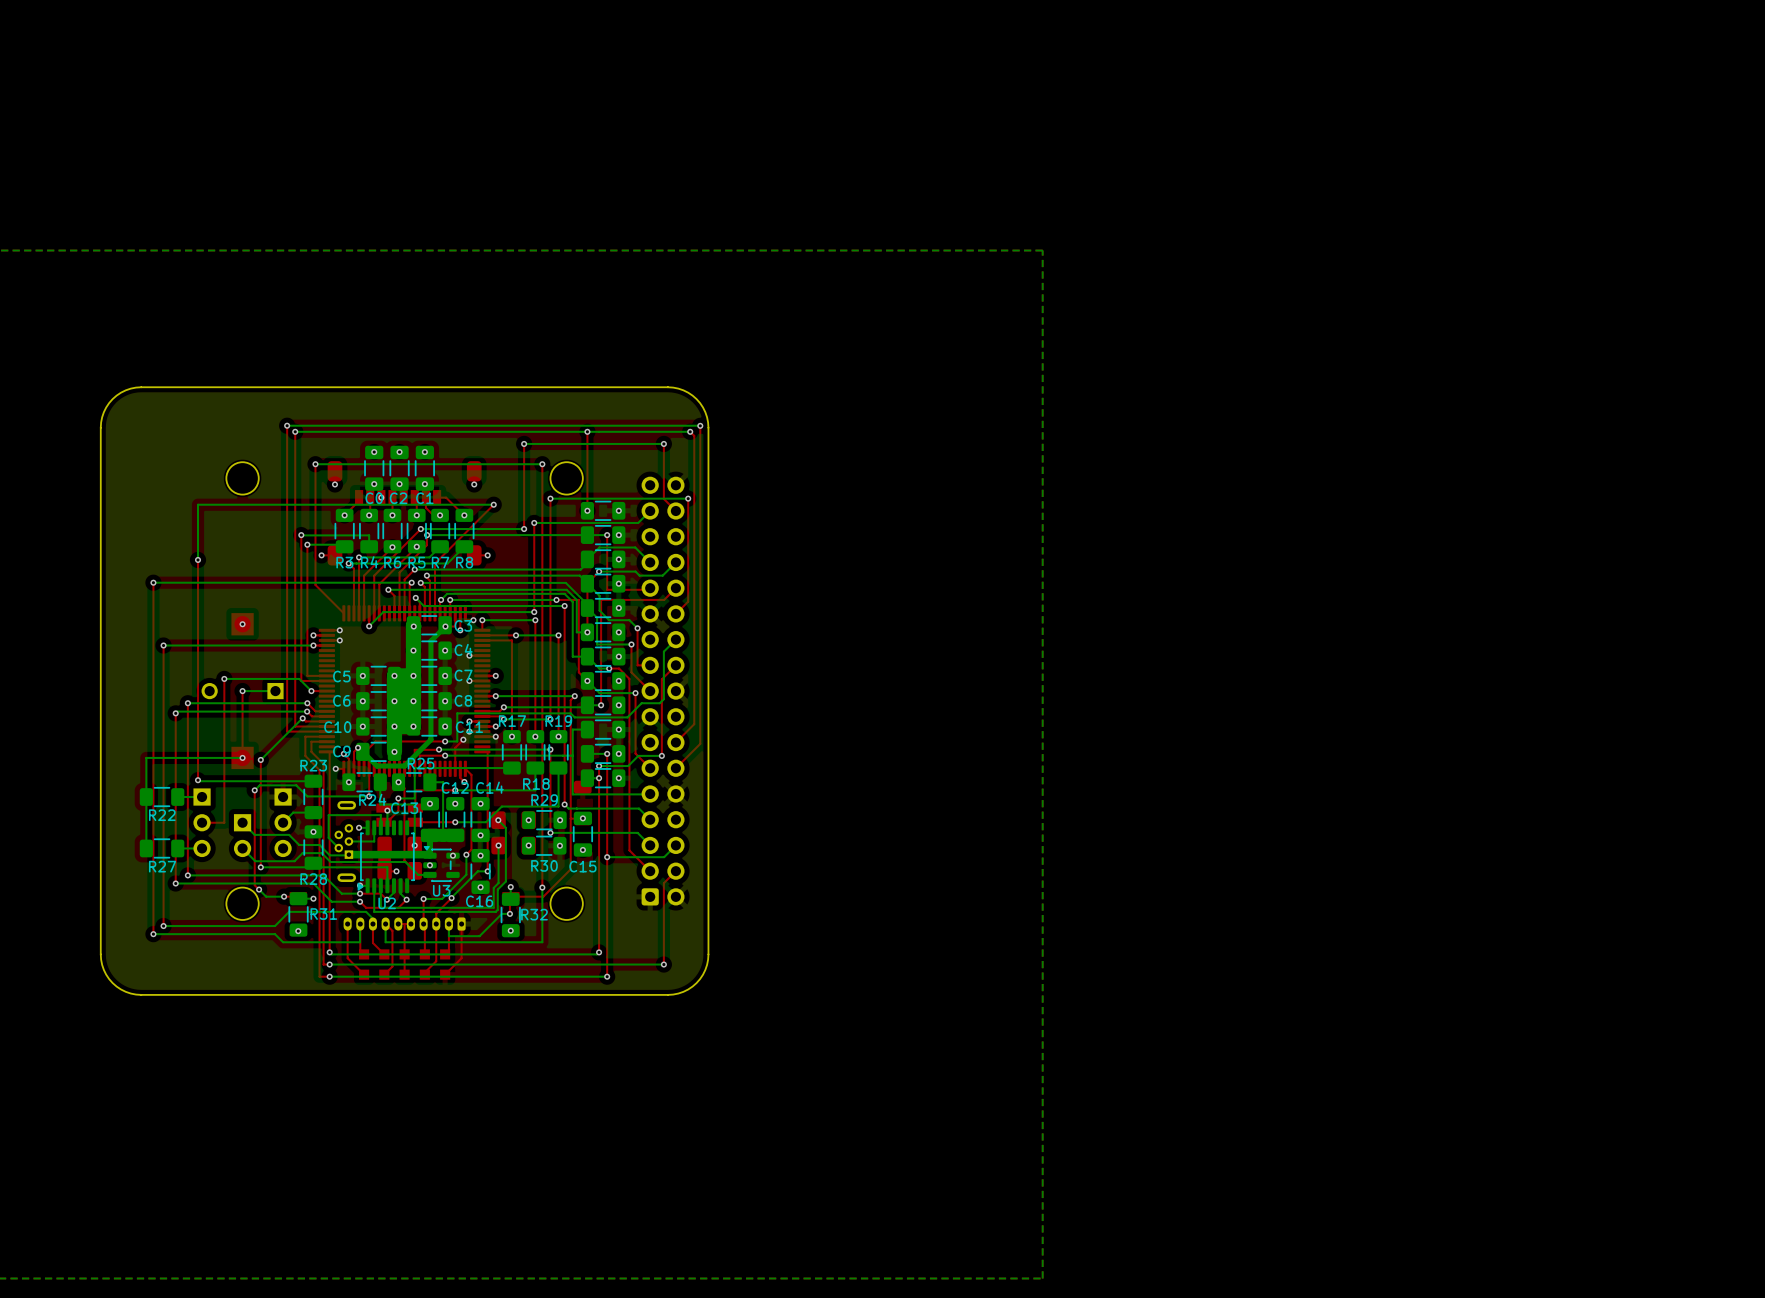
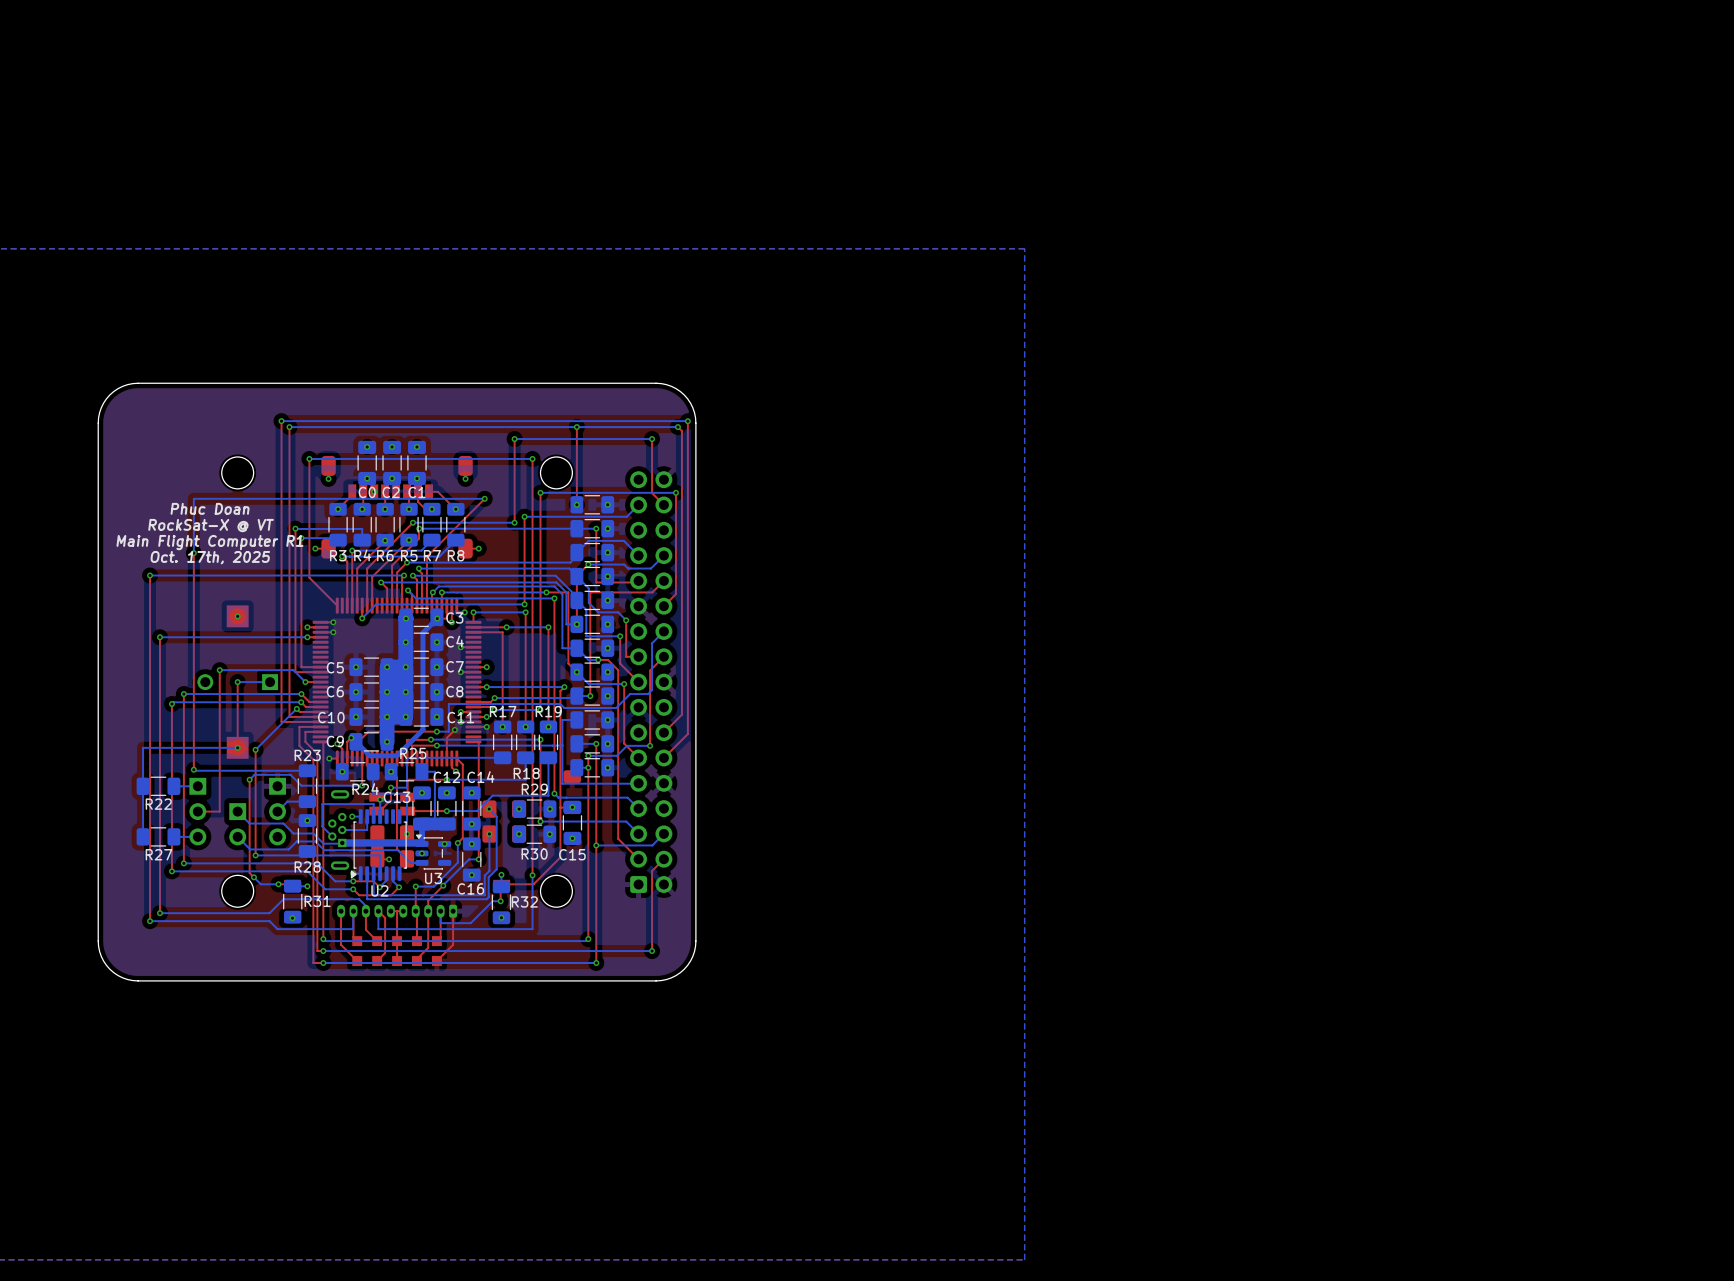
text: none -> Phuc Doan (210, 508)
text: none -> RockSat-X @ VT (211, 525)
text: none -> Main Flight Computer R1 (209, 542)
text: none -> Oct. 17th, 2025 (210, 557)

